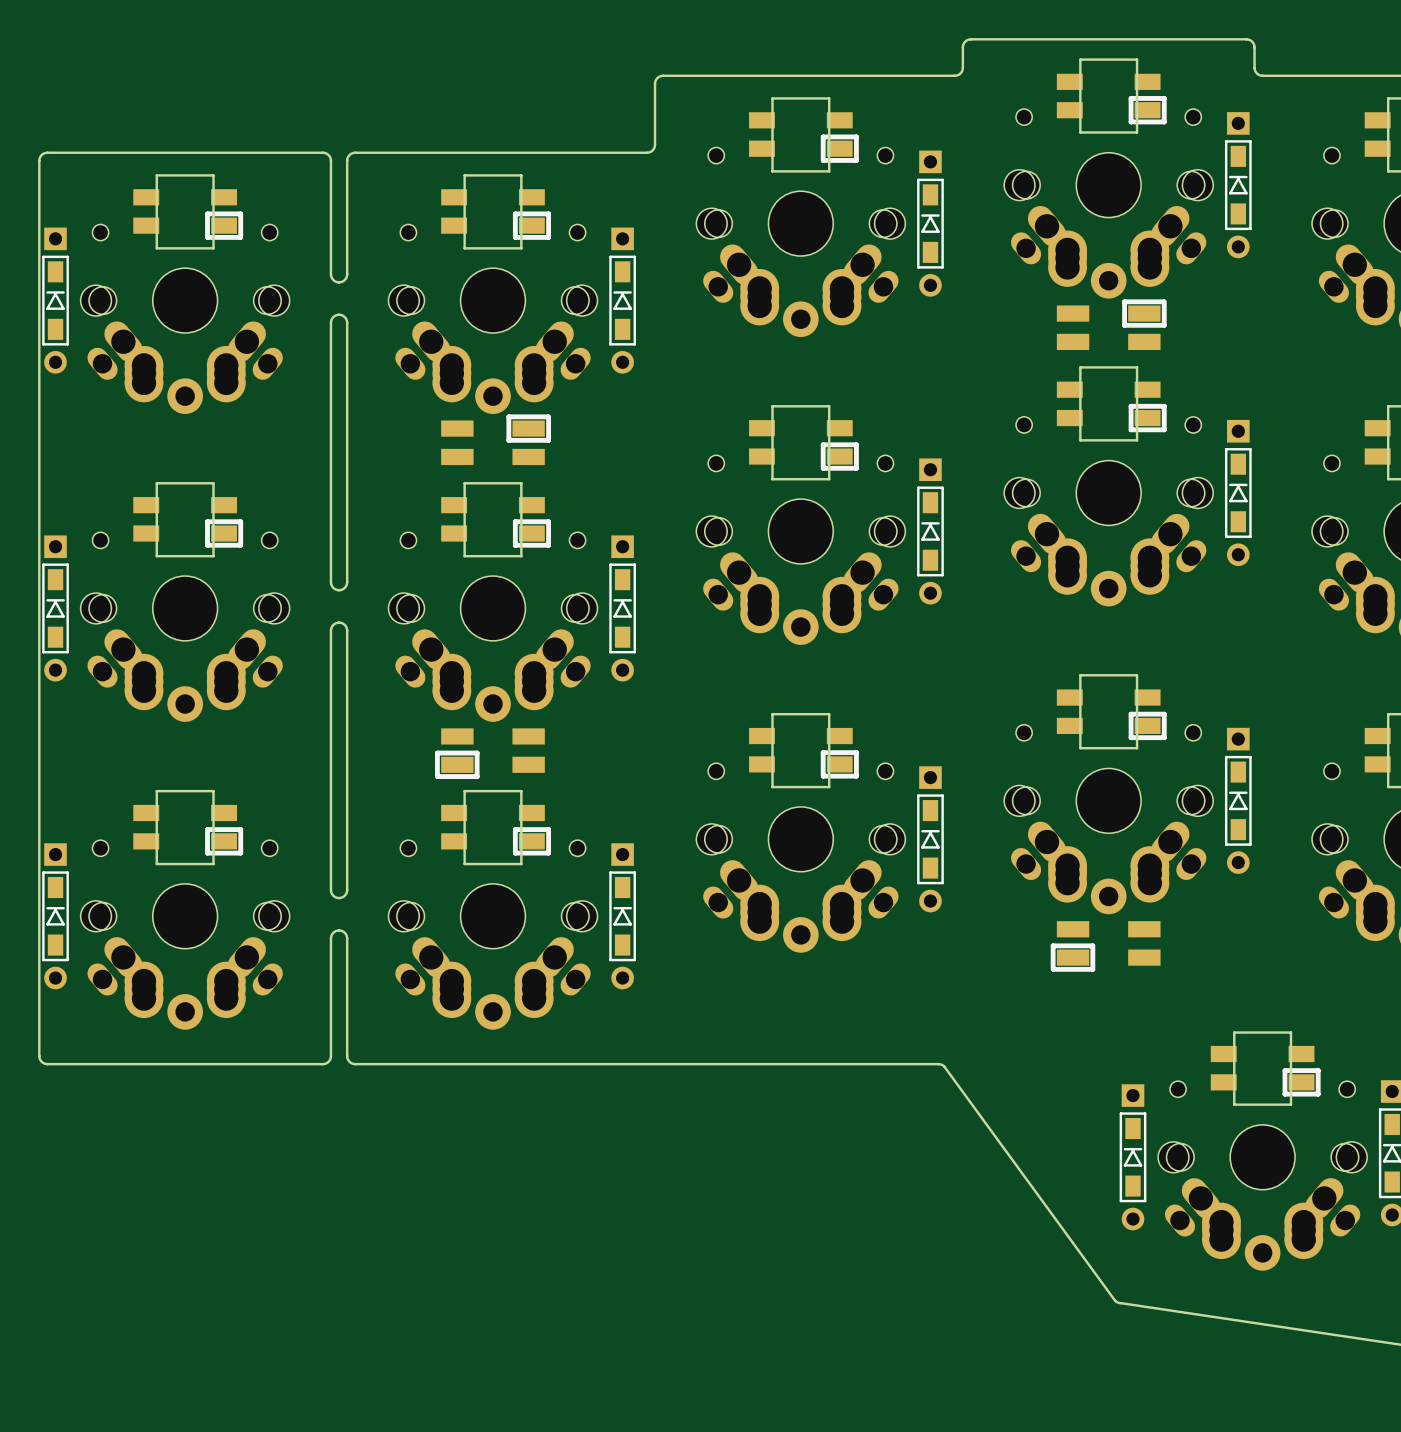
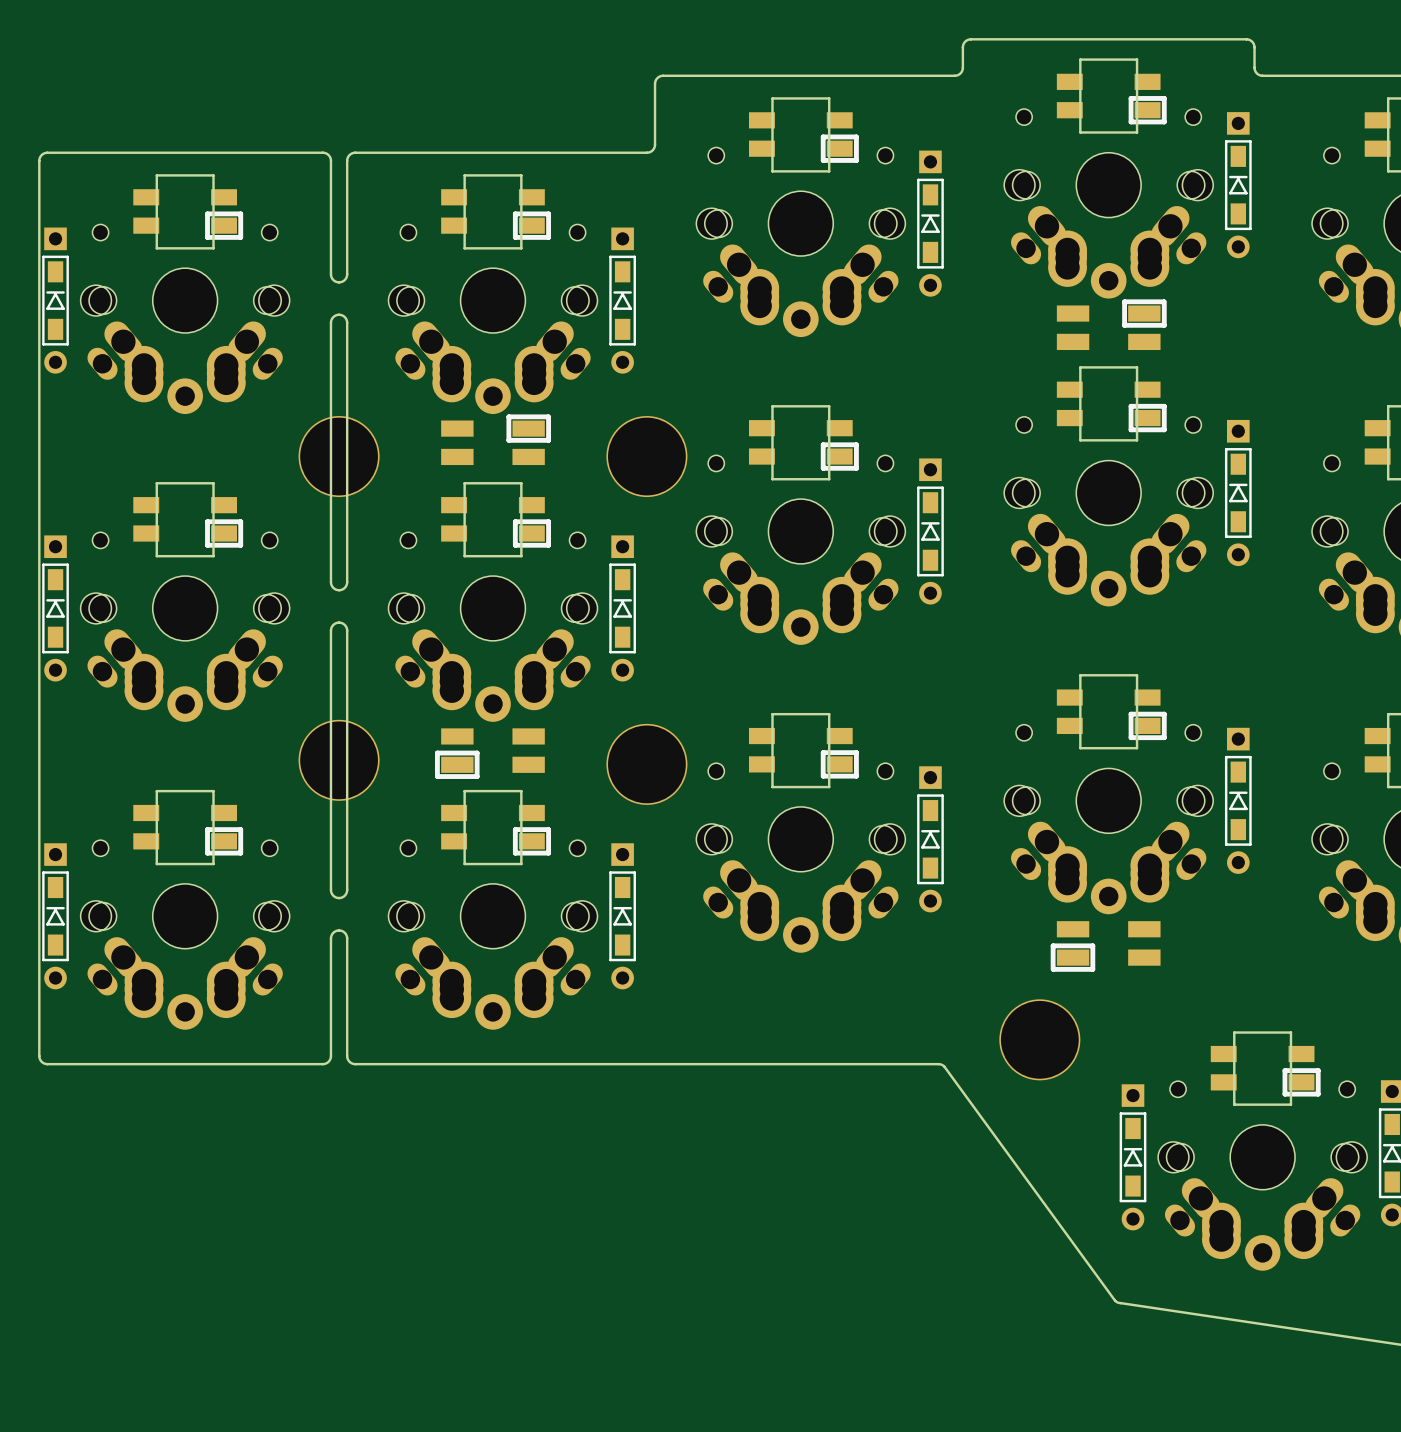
part: none -> (339, 456)
part: none -> (646, 456)
part: none -> (339, 760)
part: none -> (646, 764)
part: none -> (1039, 1039)

